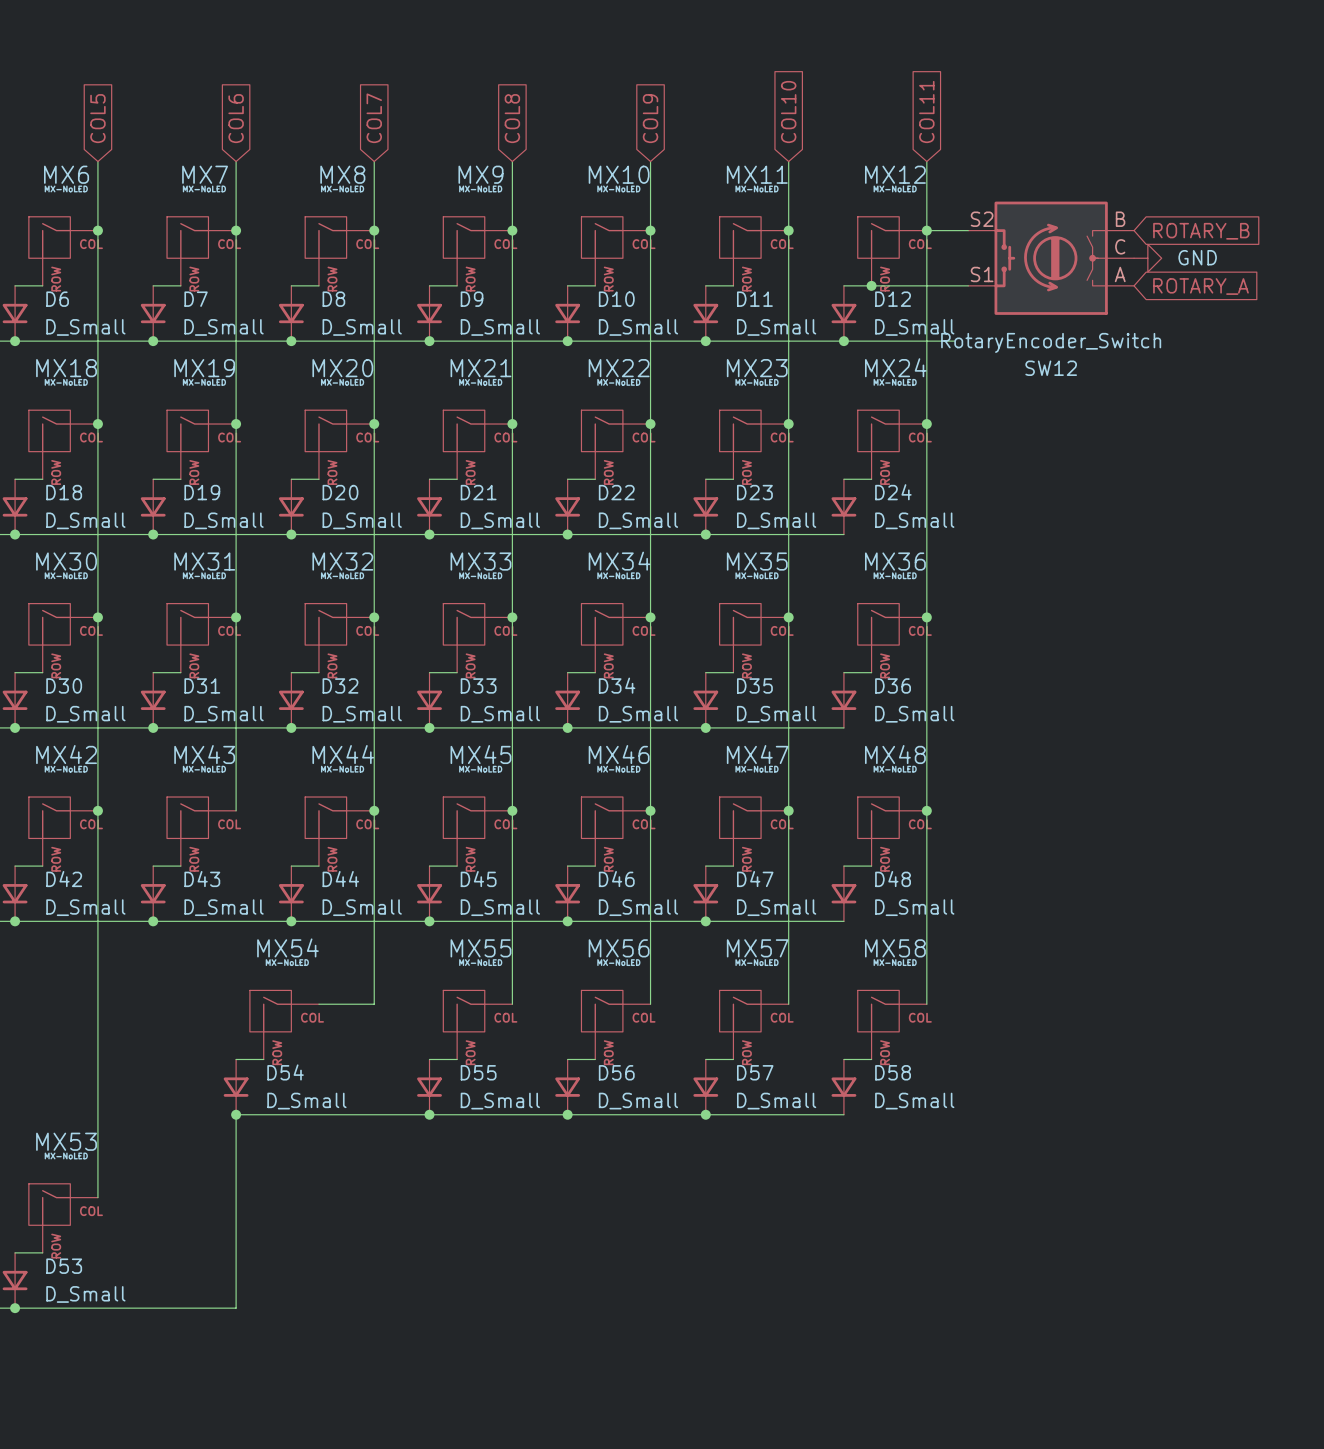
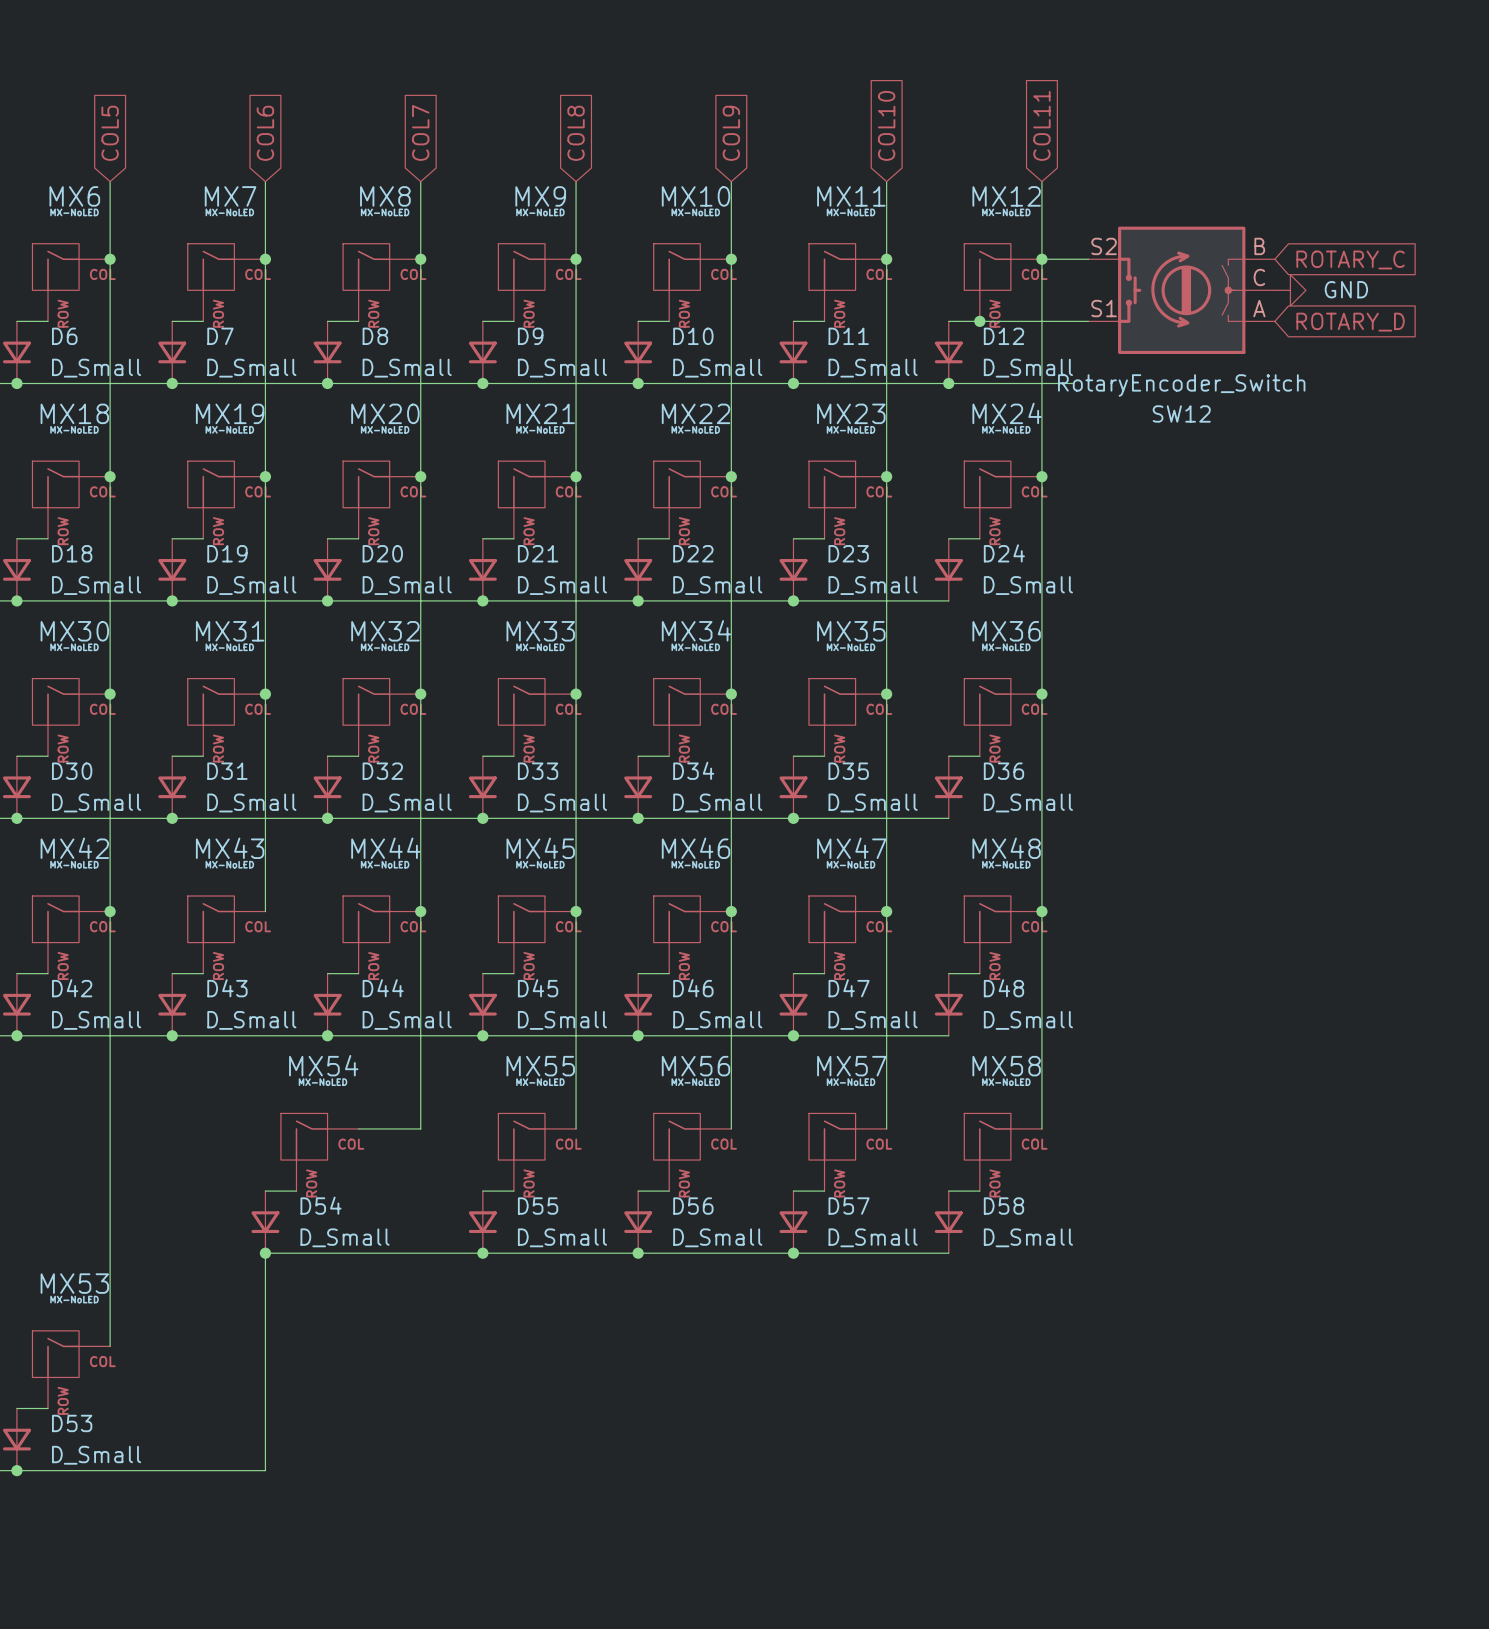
global label: ROTARY_B (1201, 231) -> ROTARY_C (1350, 259)
global label: ROTARY_A (1201, 286) -> ROTARY_D (1350, 322)

